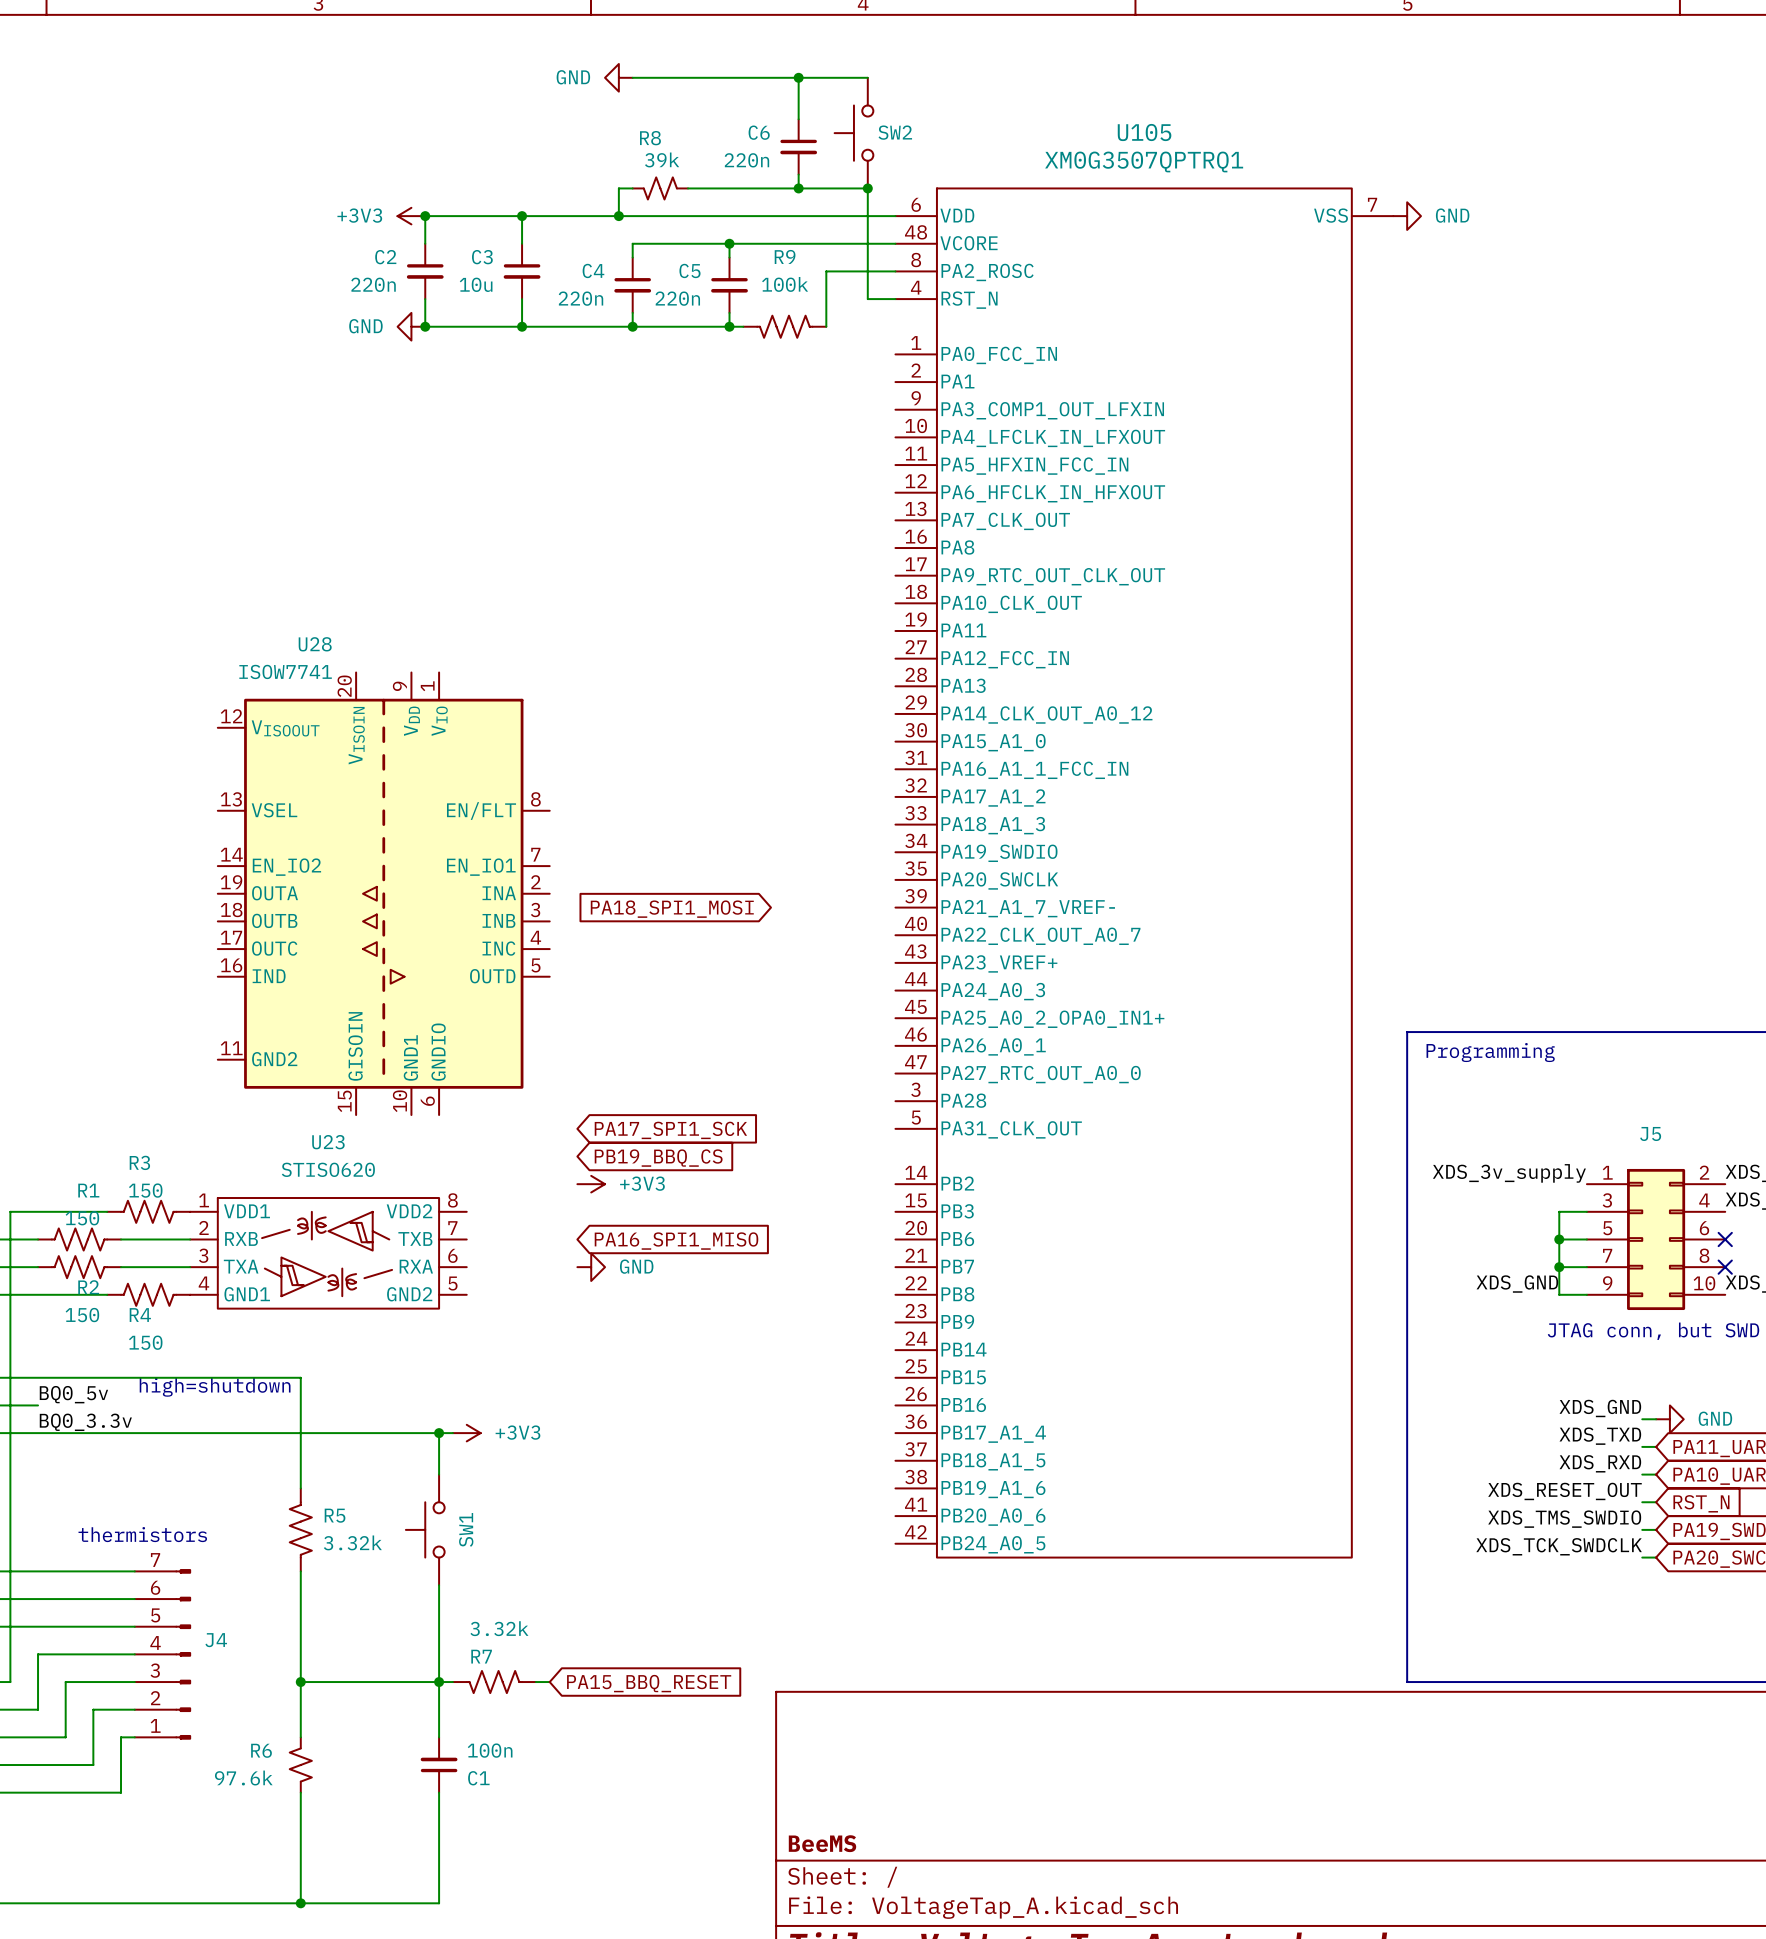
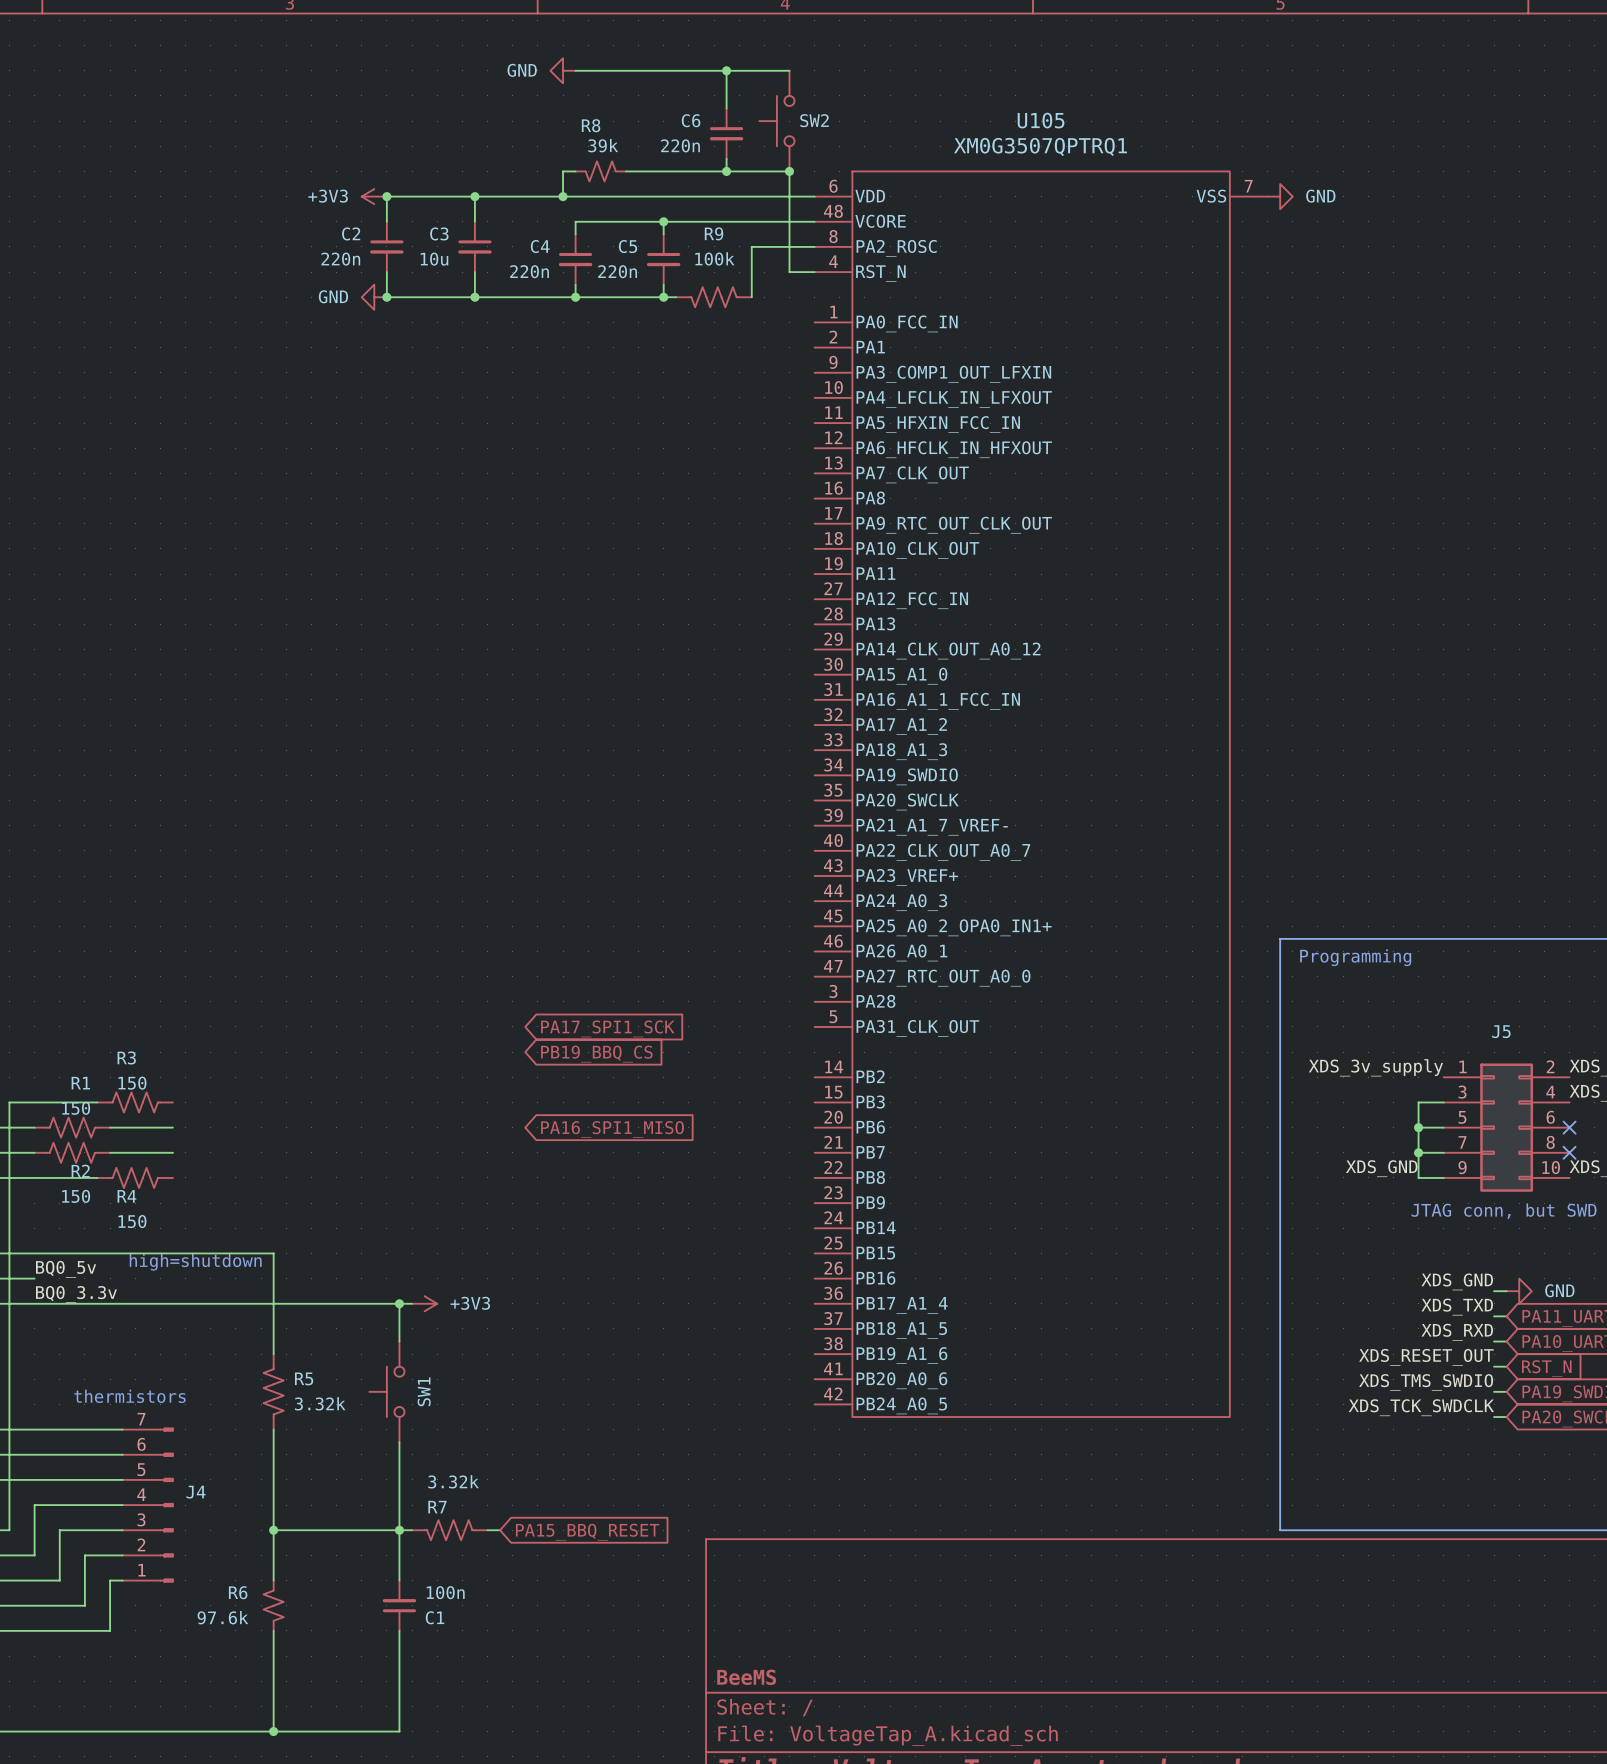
U28: ISOW7741 (383, 893) -> none
global label: PA18_SPI1_MOSI (672, 909) -> none
power symbol: +3V3 (591, 1184) -> none
U23: STISO620 (328, 1253) -> none
power symbol: GND (591, 1267) -> none

